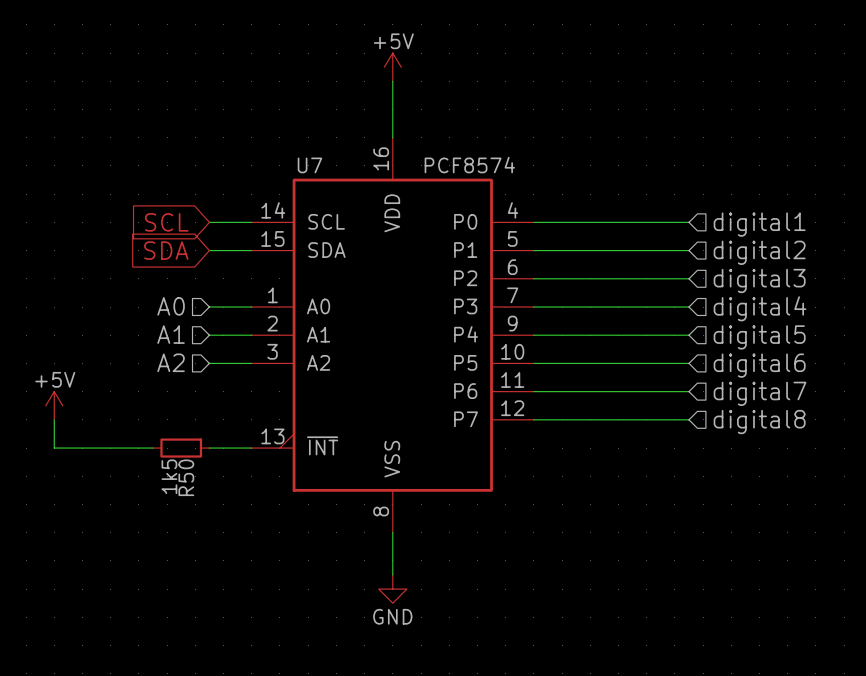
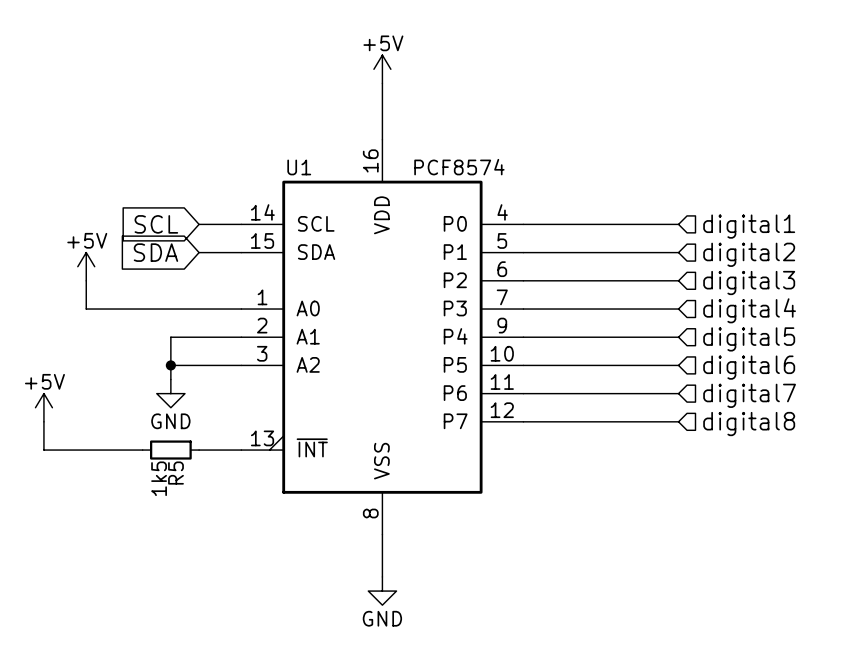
U7 name: U7 (309, 165) -> U1 (299, 167)
power symbol: none -> +5V (86, 266)
wire: none -> (86, 280) (86, 309) (199, 309)
hierarchical label: A0 (171, 306) -> none
hierarchical label: A1 (171, 334) -> none
wire: none -> (199, 337) (170, 337) (170, 379)
hierarchical label: A2 (171, 362) -> none
wire: none -> (170, 365) (199, 365)
junction: none -> (170, 365)
power symbol: none -> GND (170, 393)
R50 name: R50 (186, 477) -> R5 (175, 473)

